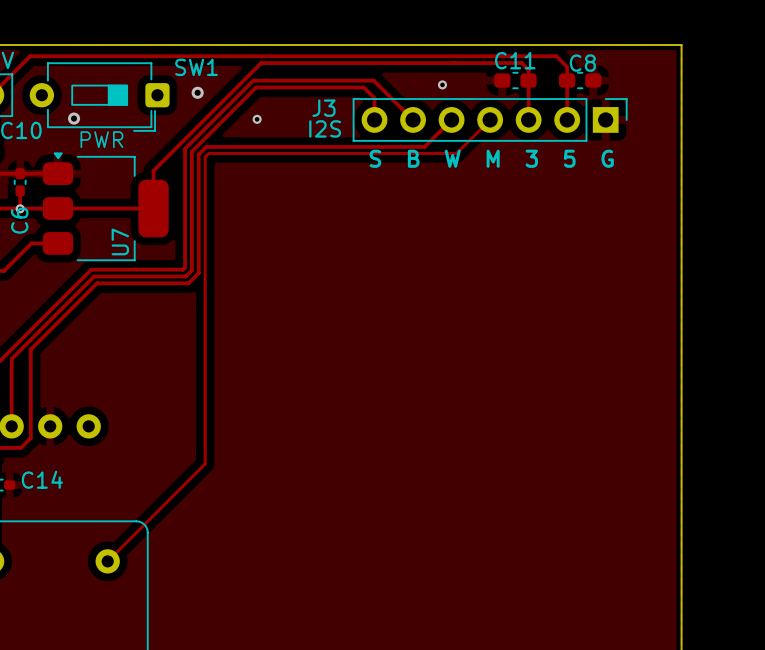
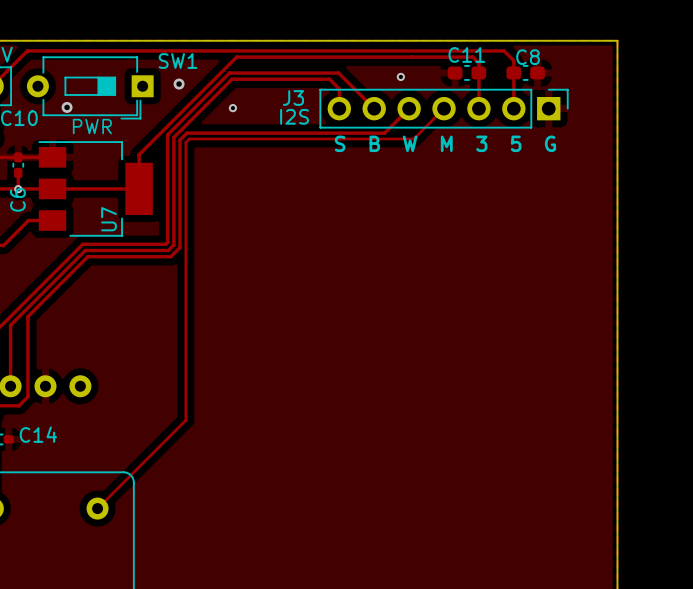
SW1 footprint: [29, 62, 170, 132] -> [26, 56, 154, 120]
U7 footprint: [42, 152, 169, 262] -> [38, 141, 153, 237]

